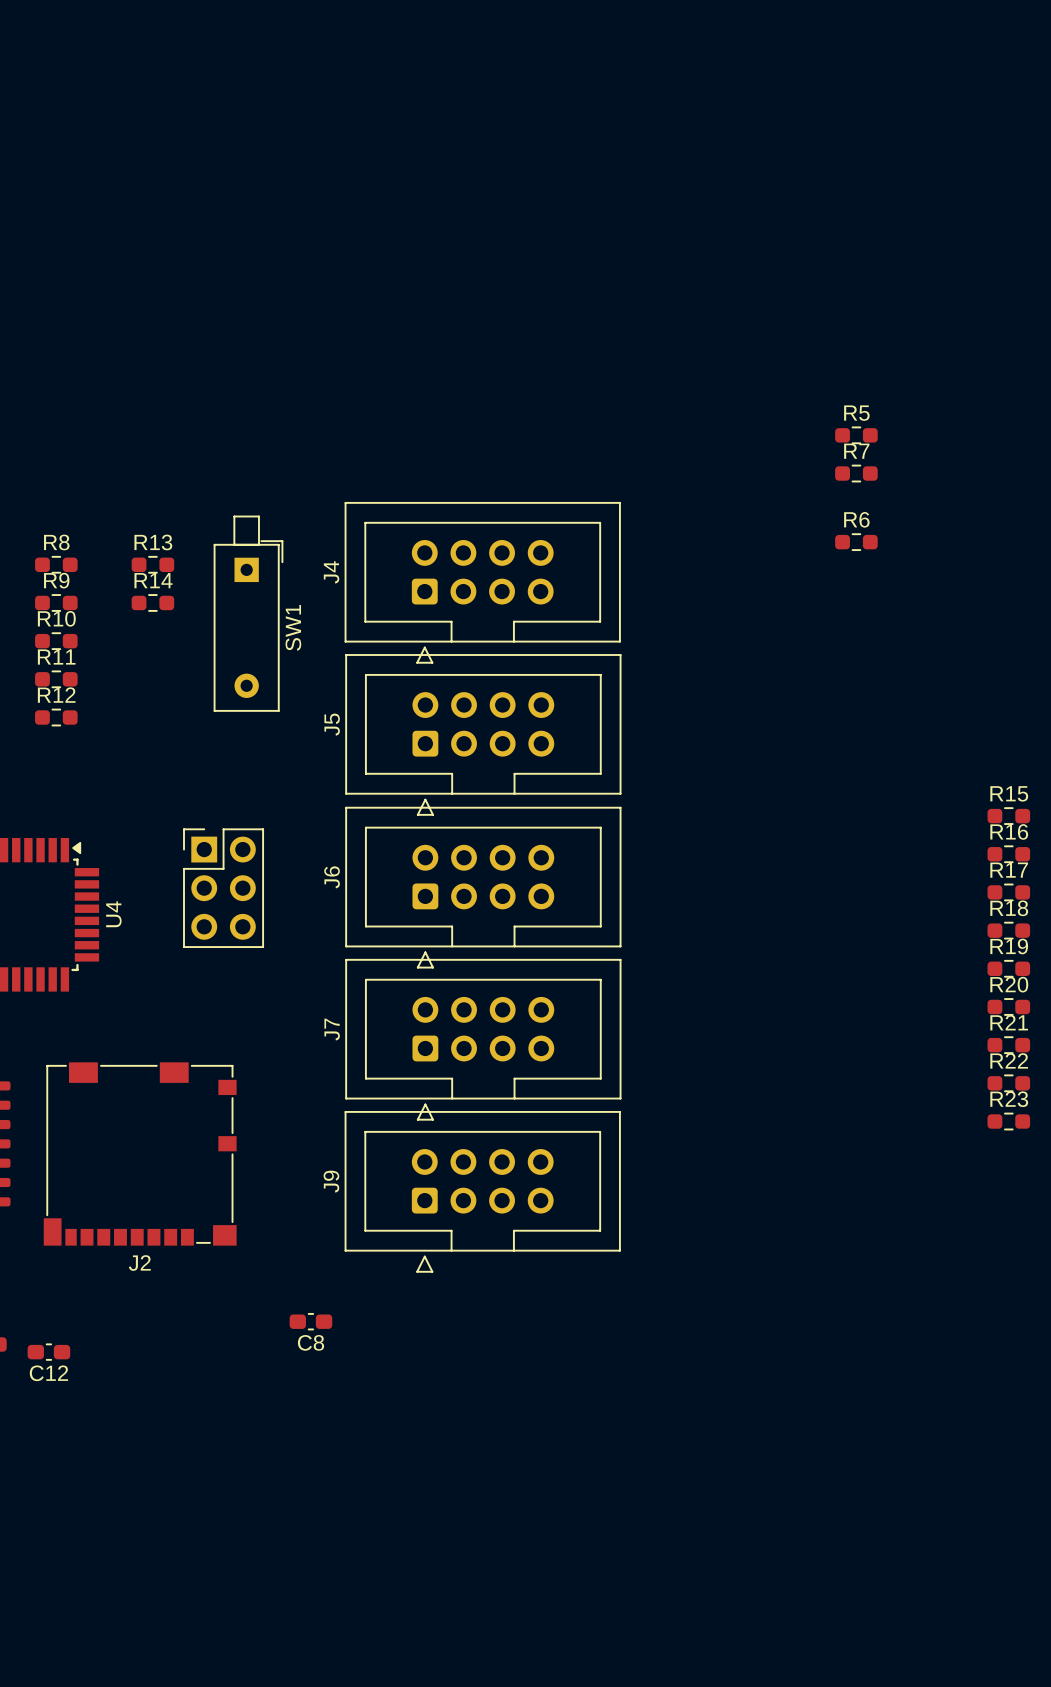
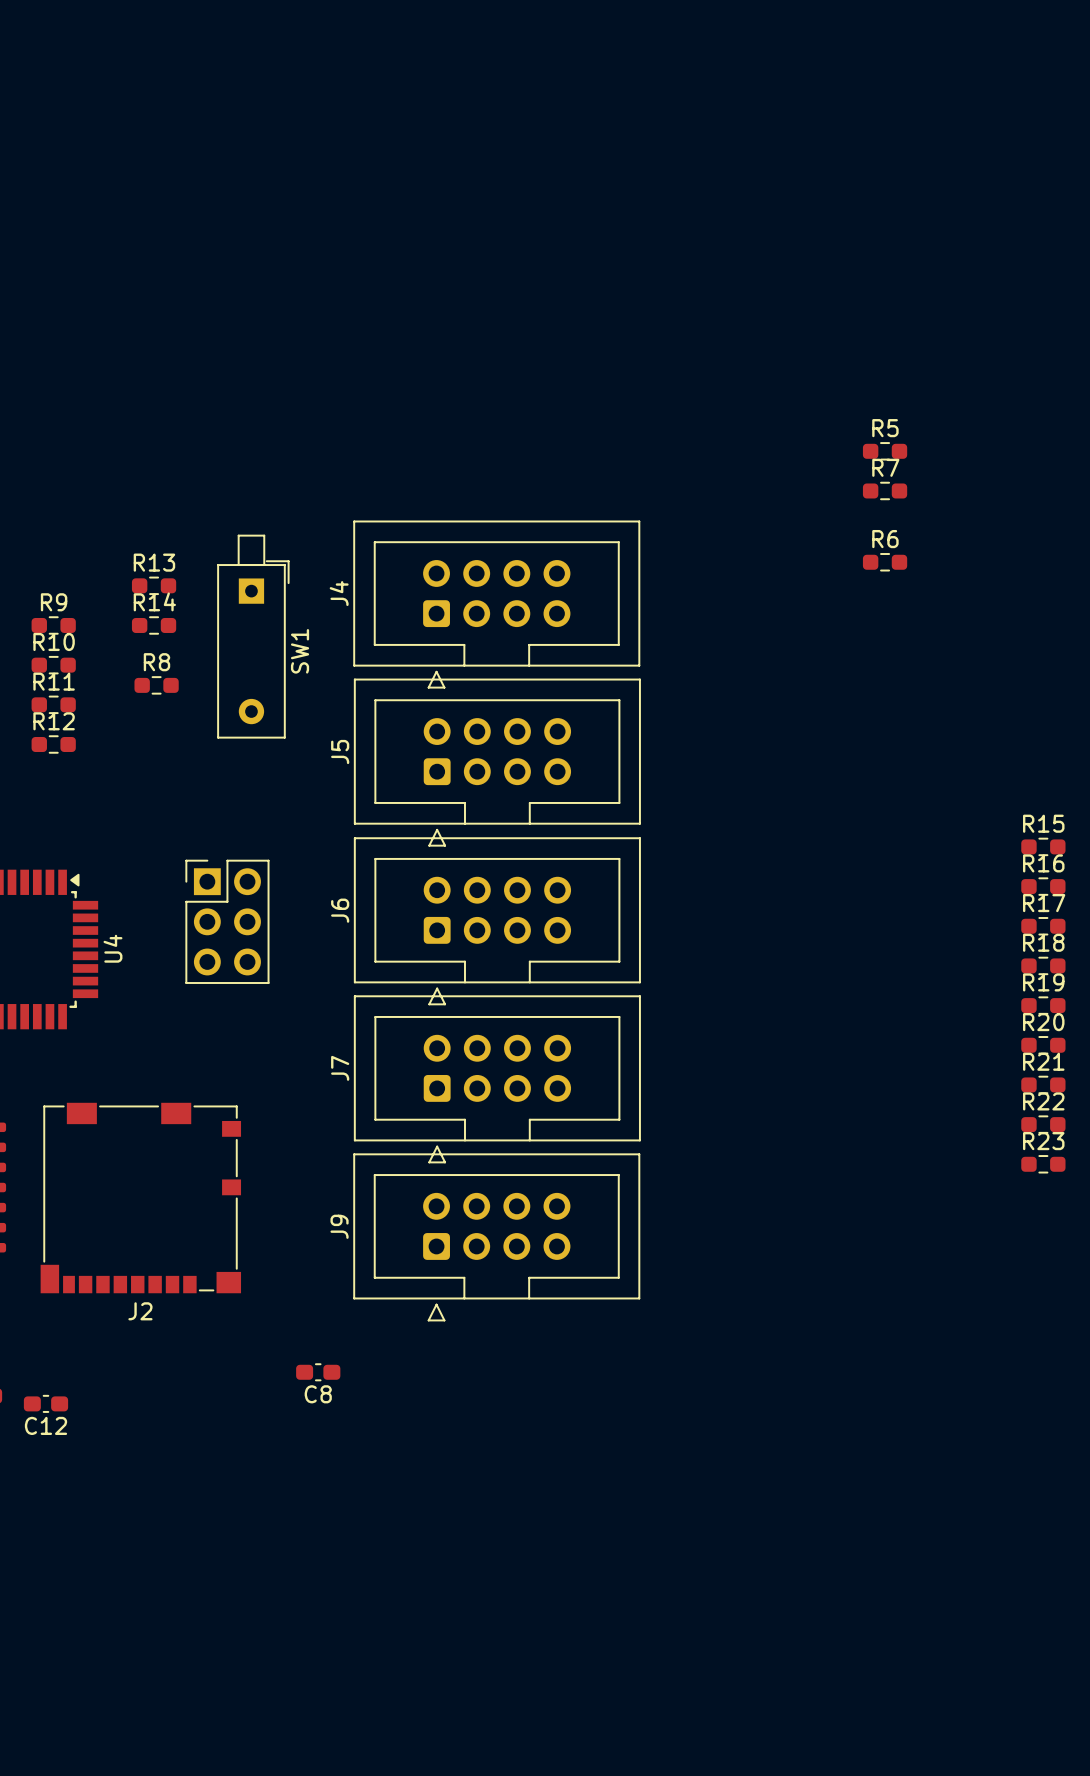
R8 position: (56, 564) -> (156, 685)

